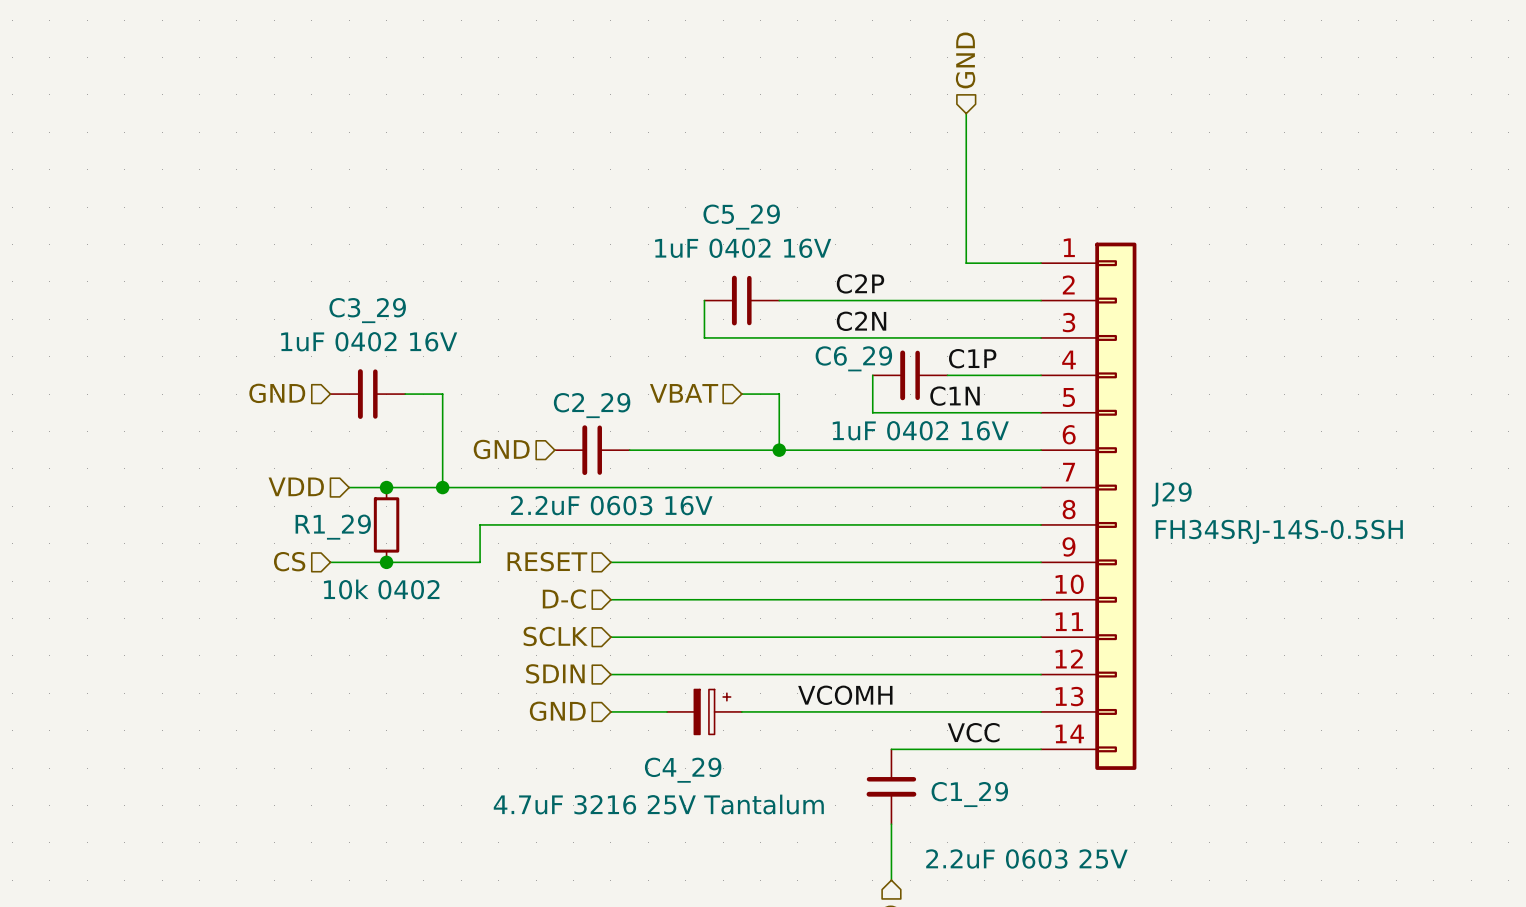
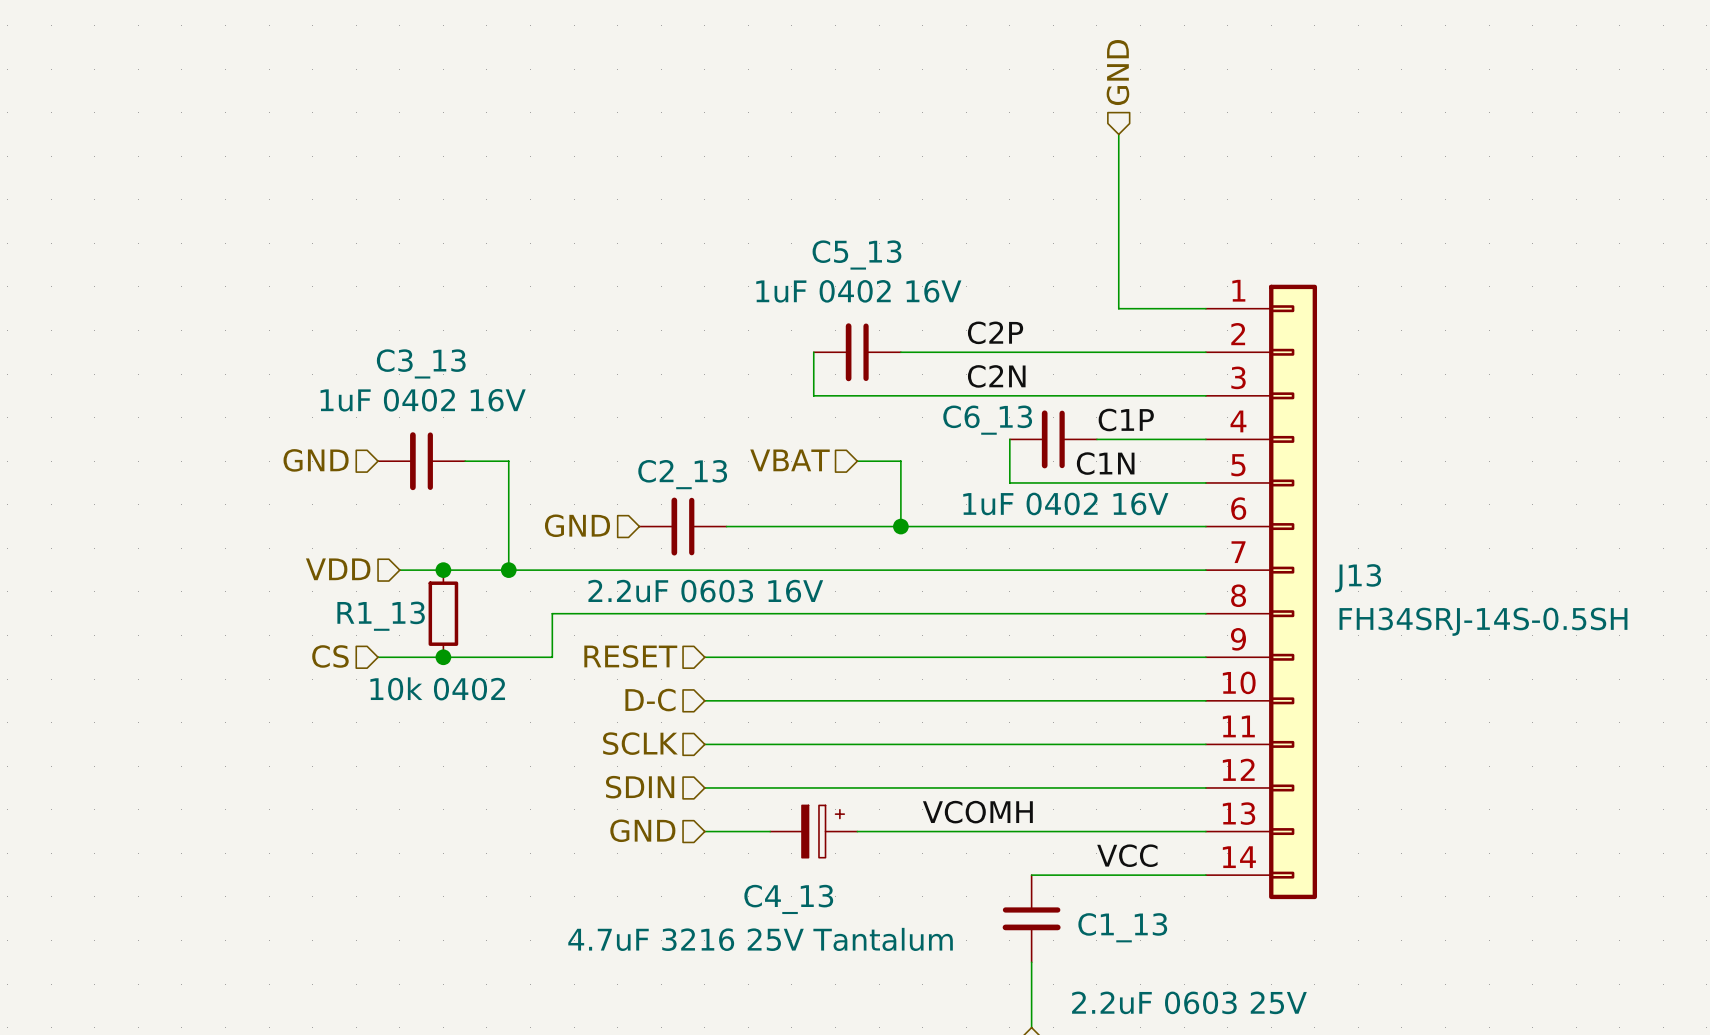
C5_29 name: C5_29 (741, 217) -> C5_13 (856, 255)
C3_29 name: C3_29 (367, 310) -> C3_13 (421, 363)
C6_29 name: C6_29 (853, 358) -> C6_13 (987, 420)
C2_29 name: C2_29 (592, 405) -> C2_13 (682, 474)
J29 name: J29 (1171, 494) -> J13 (1358, 578)
R1_29 name: R1_29 (333, 527) -> R1_13 (381, 616)
C4_29 name: C4_29 (683, 770) -> C4_13 (788, 899)
C1_29 name: C1_29 (969, 794) -> C1_13 (1122, 927)

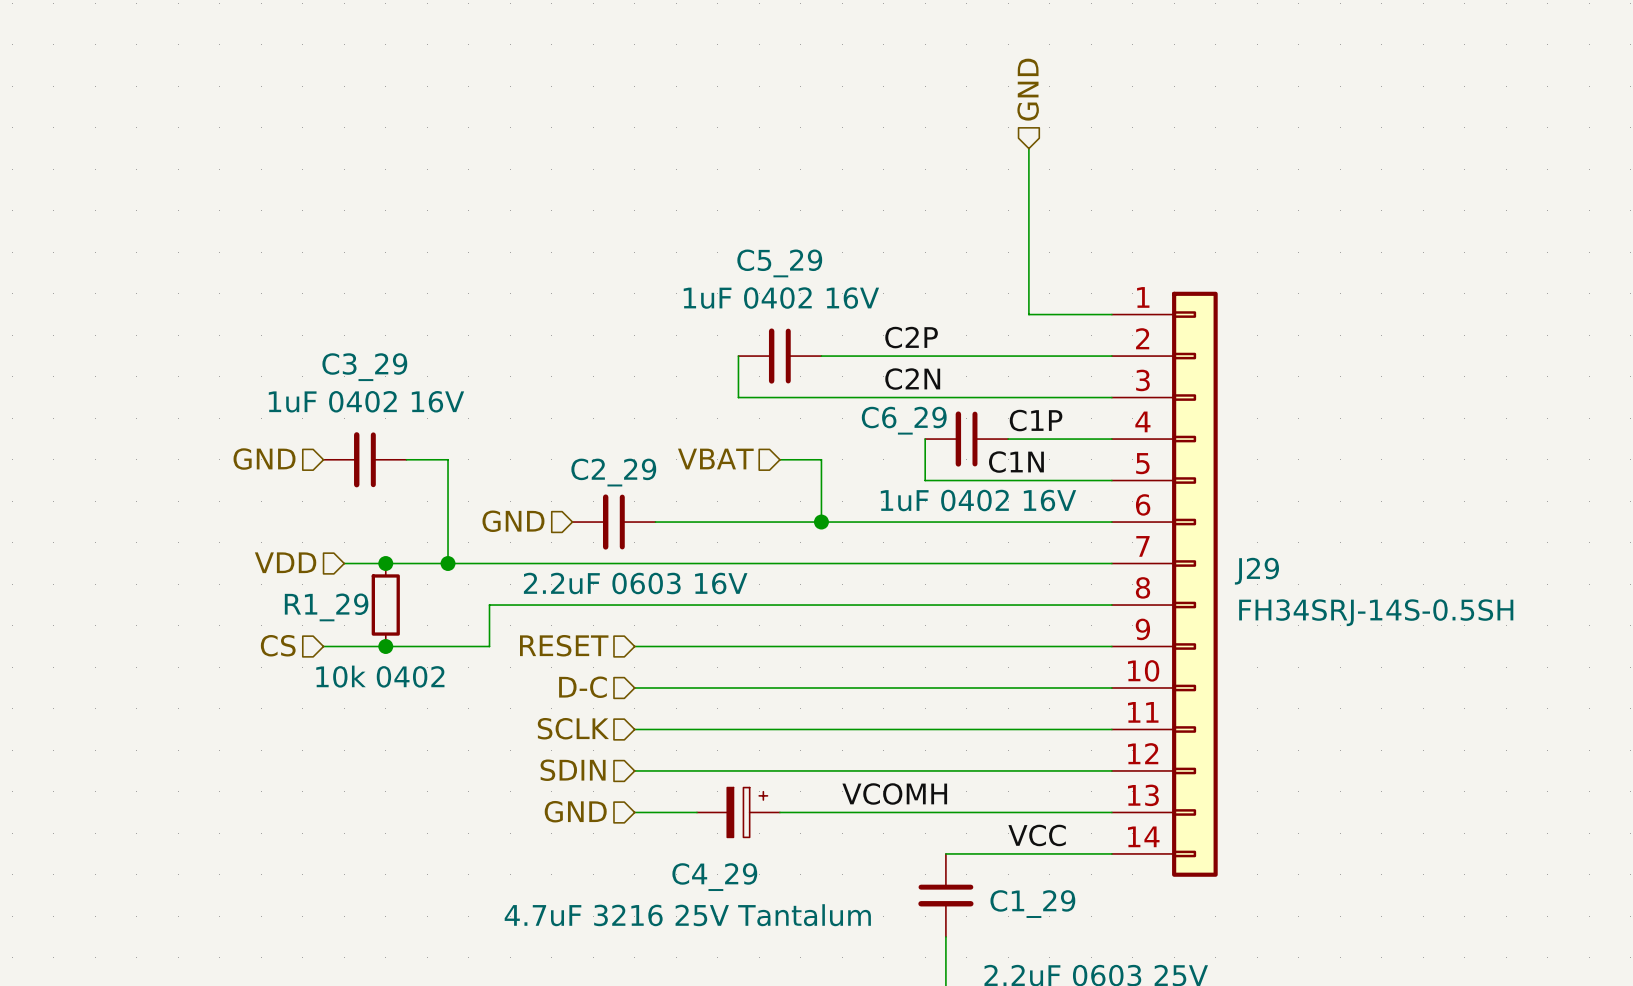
C5_13 name: C5_13 (856, 255) -> C5_29 (779, 263)
C3_13 name: C3_13 (421, 363) -> C3_29 (364, 367)
C6_13 name: C6_13 (987, 420) -> C6_29 (904, 420)
C2_13 name: C2_13 (682, 474) -> C2_29 (613, 472)
J13 name: J13 (1358, 578) -> J29 (1256, 571)
R1_13 name: R1_13 (381, 616) -> R1_29 (326, 607)
C4_13 name: C4_13 (788, 899) -> C4_29 (714, 877)
C1_13 name: C1_13 (1122, 927) -> C1_29 (1032, 904)

